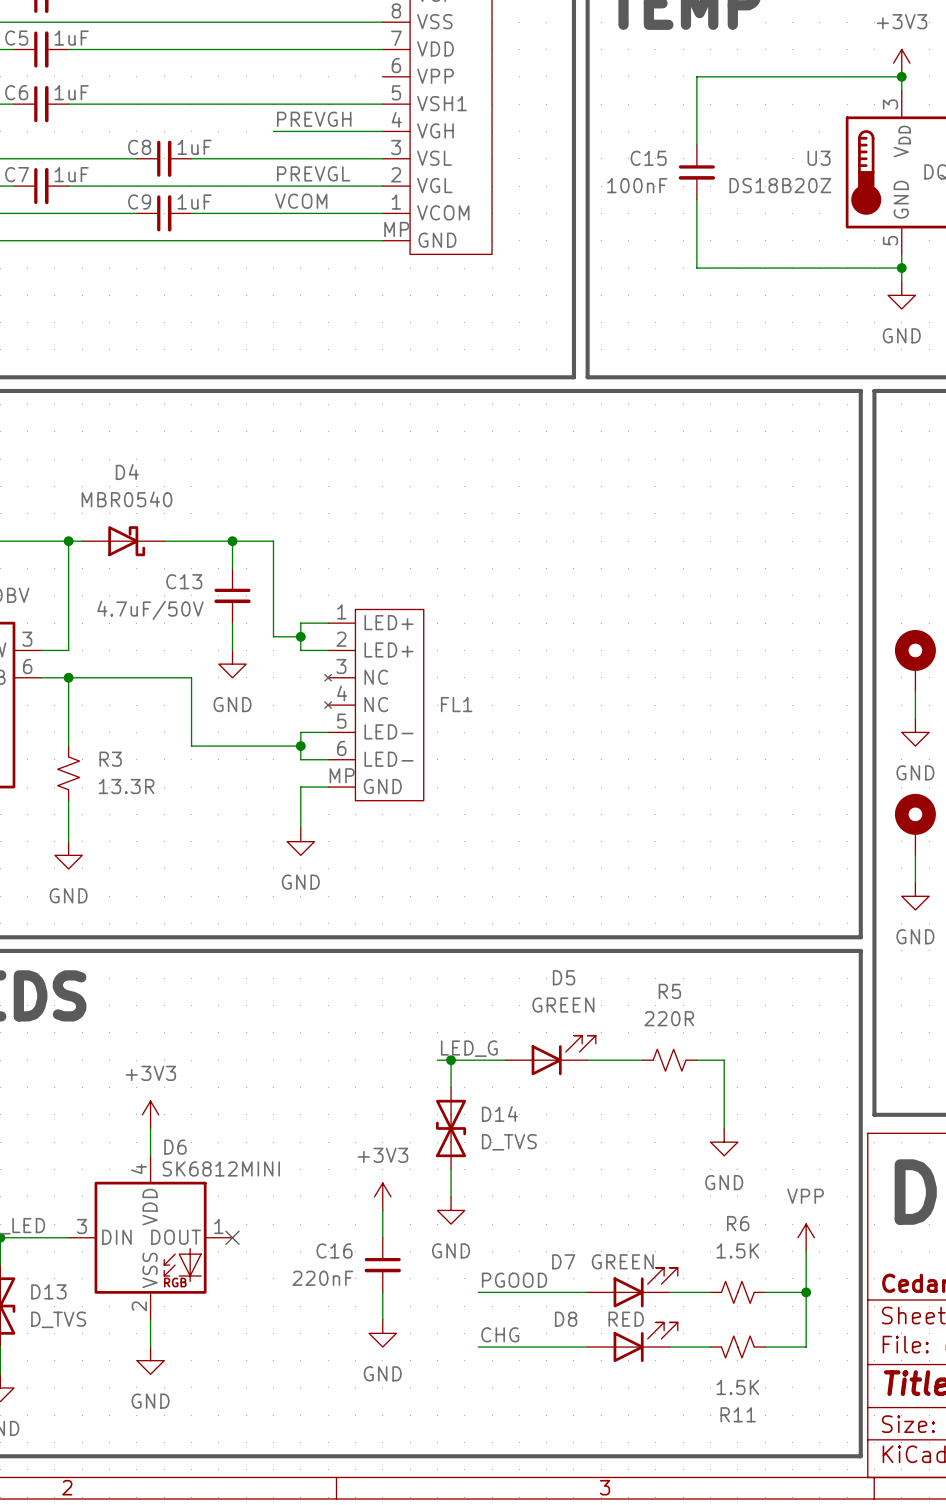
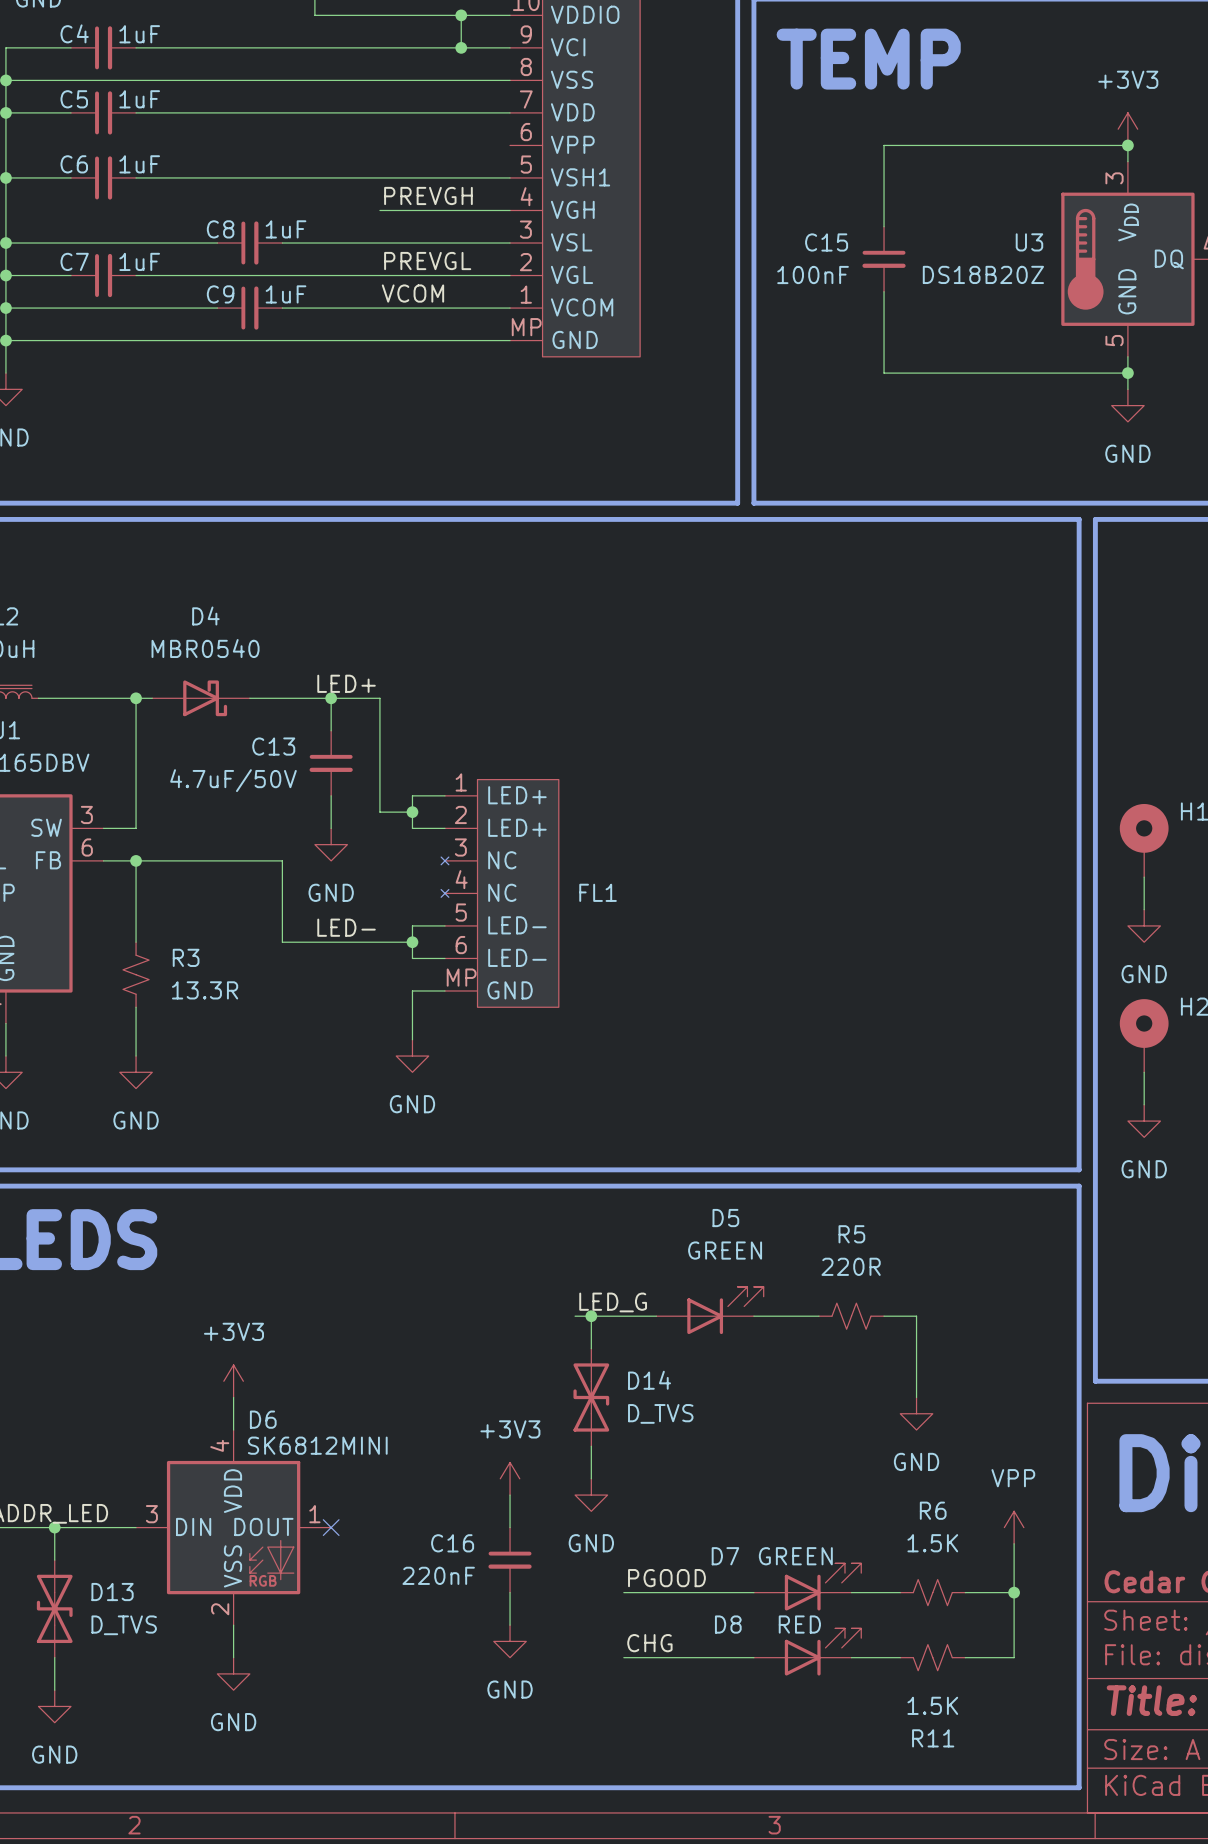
label: none -> LED+ (346, 683)
label: none -> LED- (346, 927)

